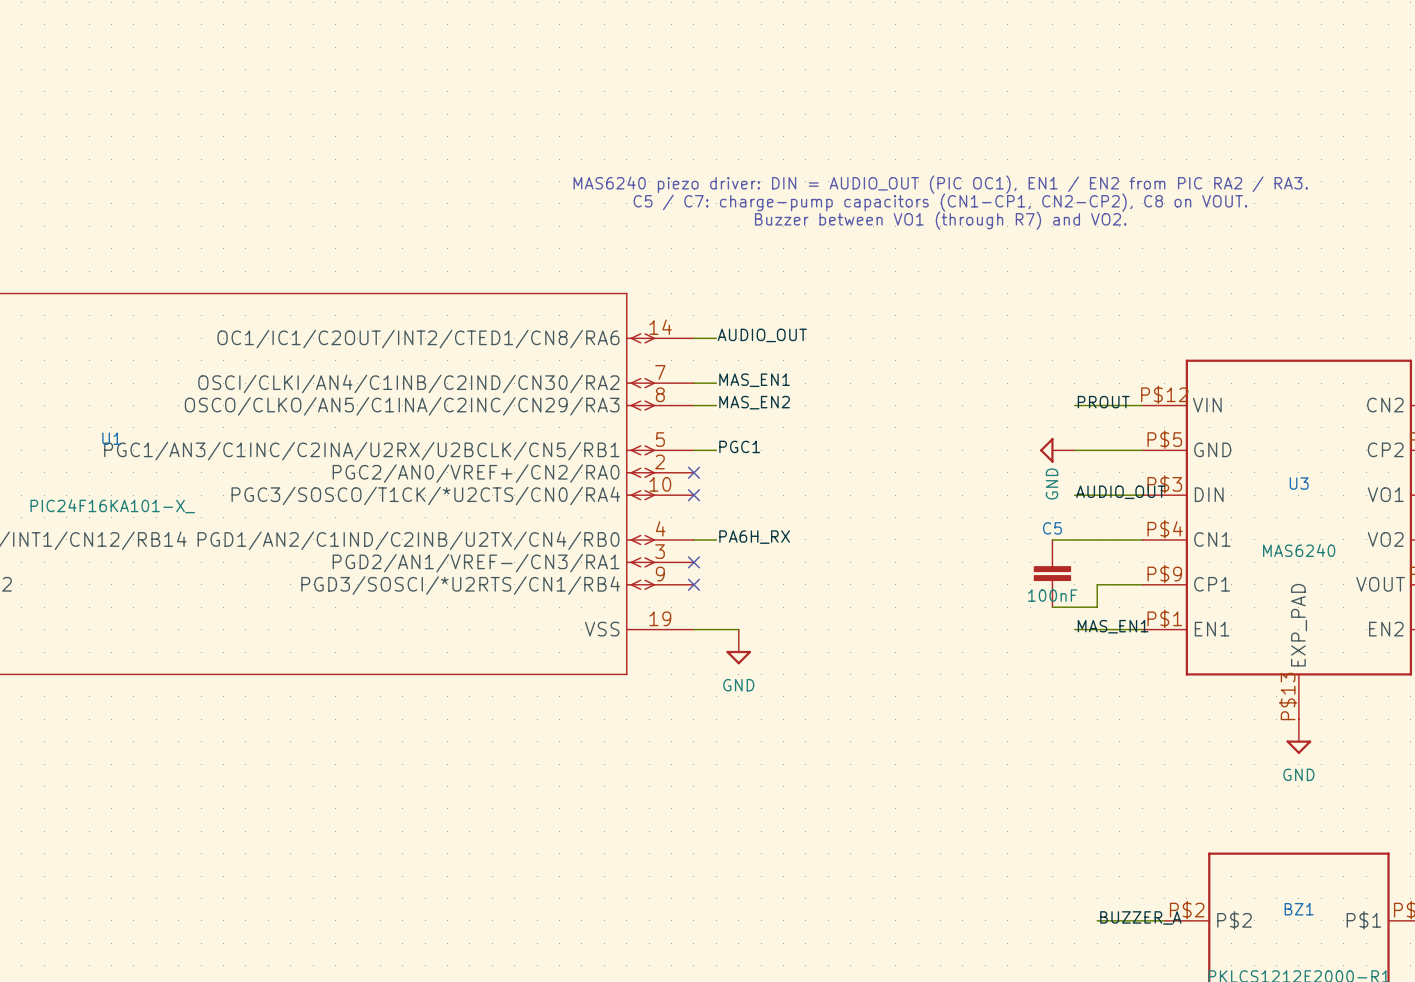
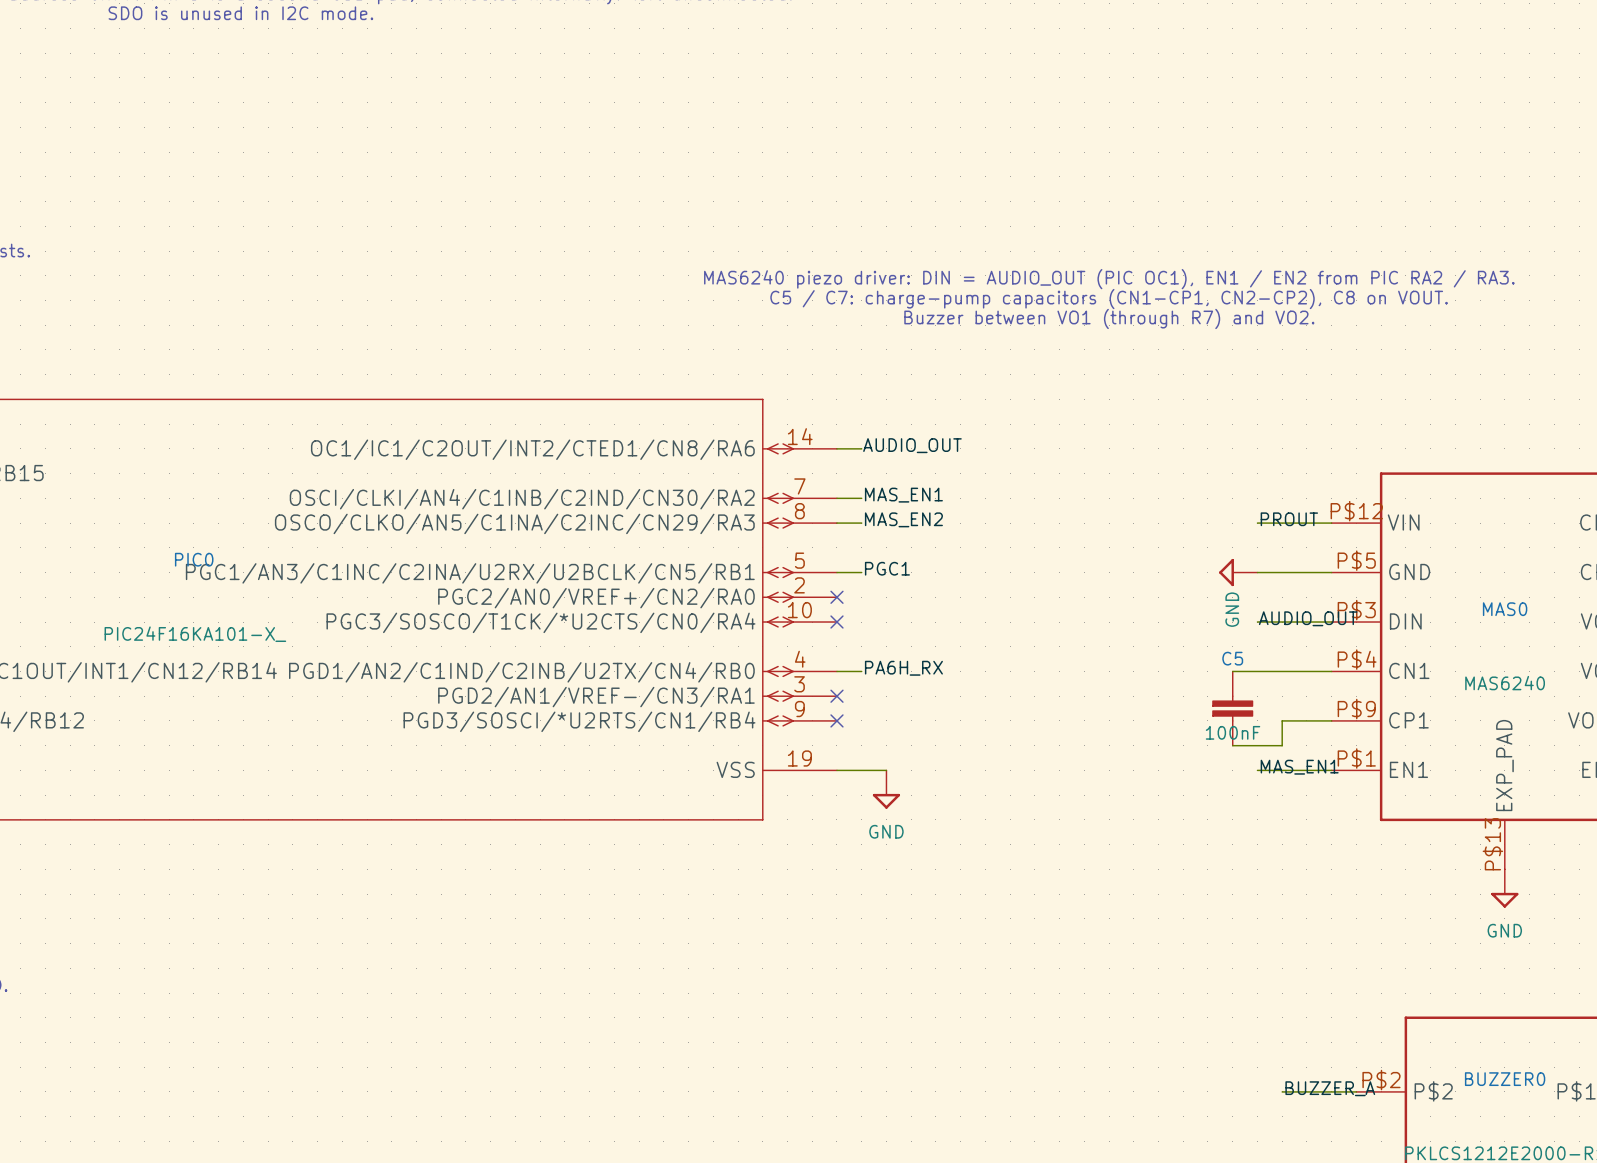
U1 name: U1 (111, 438) -> PIC0 (194, 559)
U3 name: U3 (1299, 483) -> MAS0 (1505, 609)
BZ1 name: BZ1 (1299, 909) -> BUZZER0 (1505, 1079)

